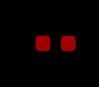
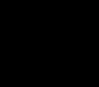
part: (55, 43) -> none

